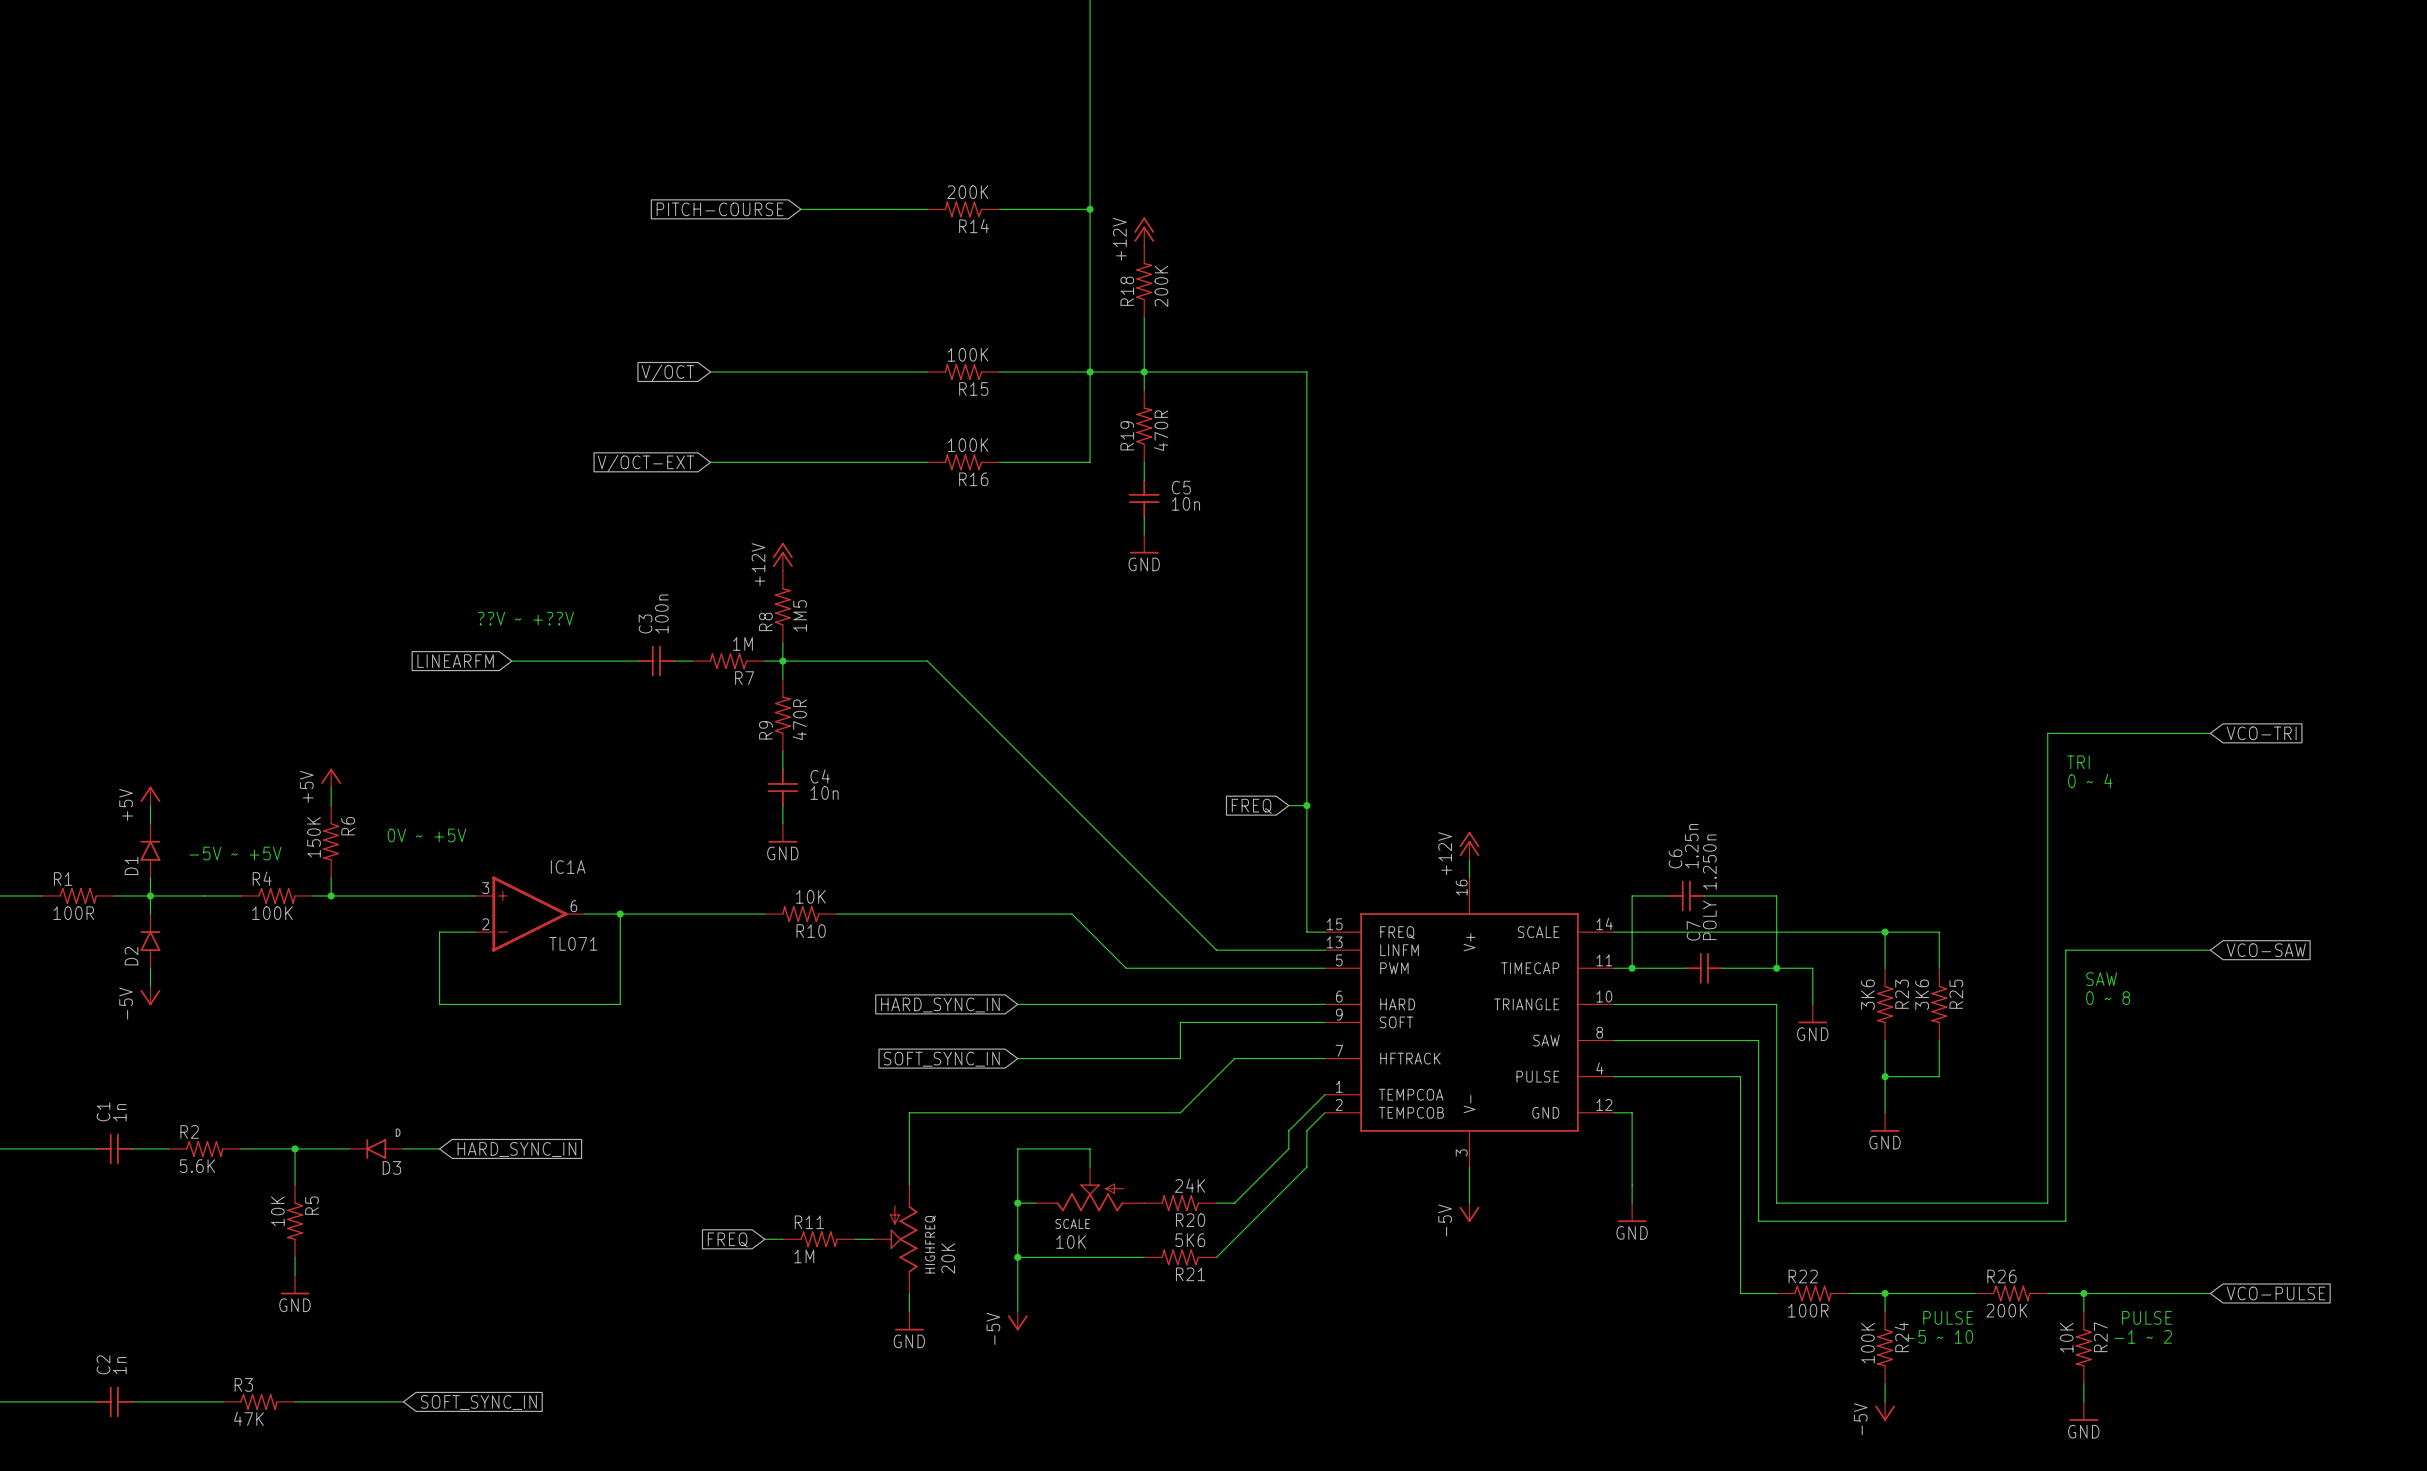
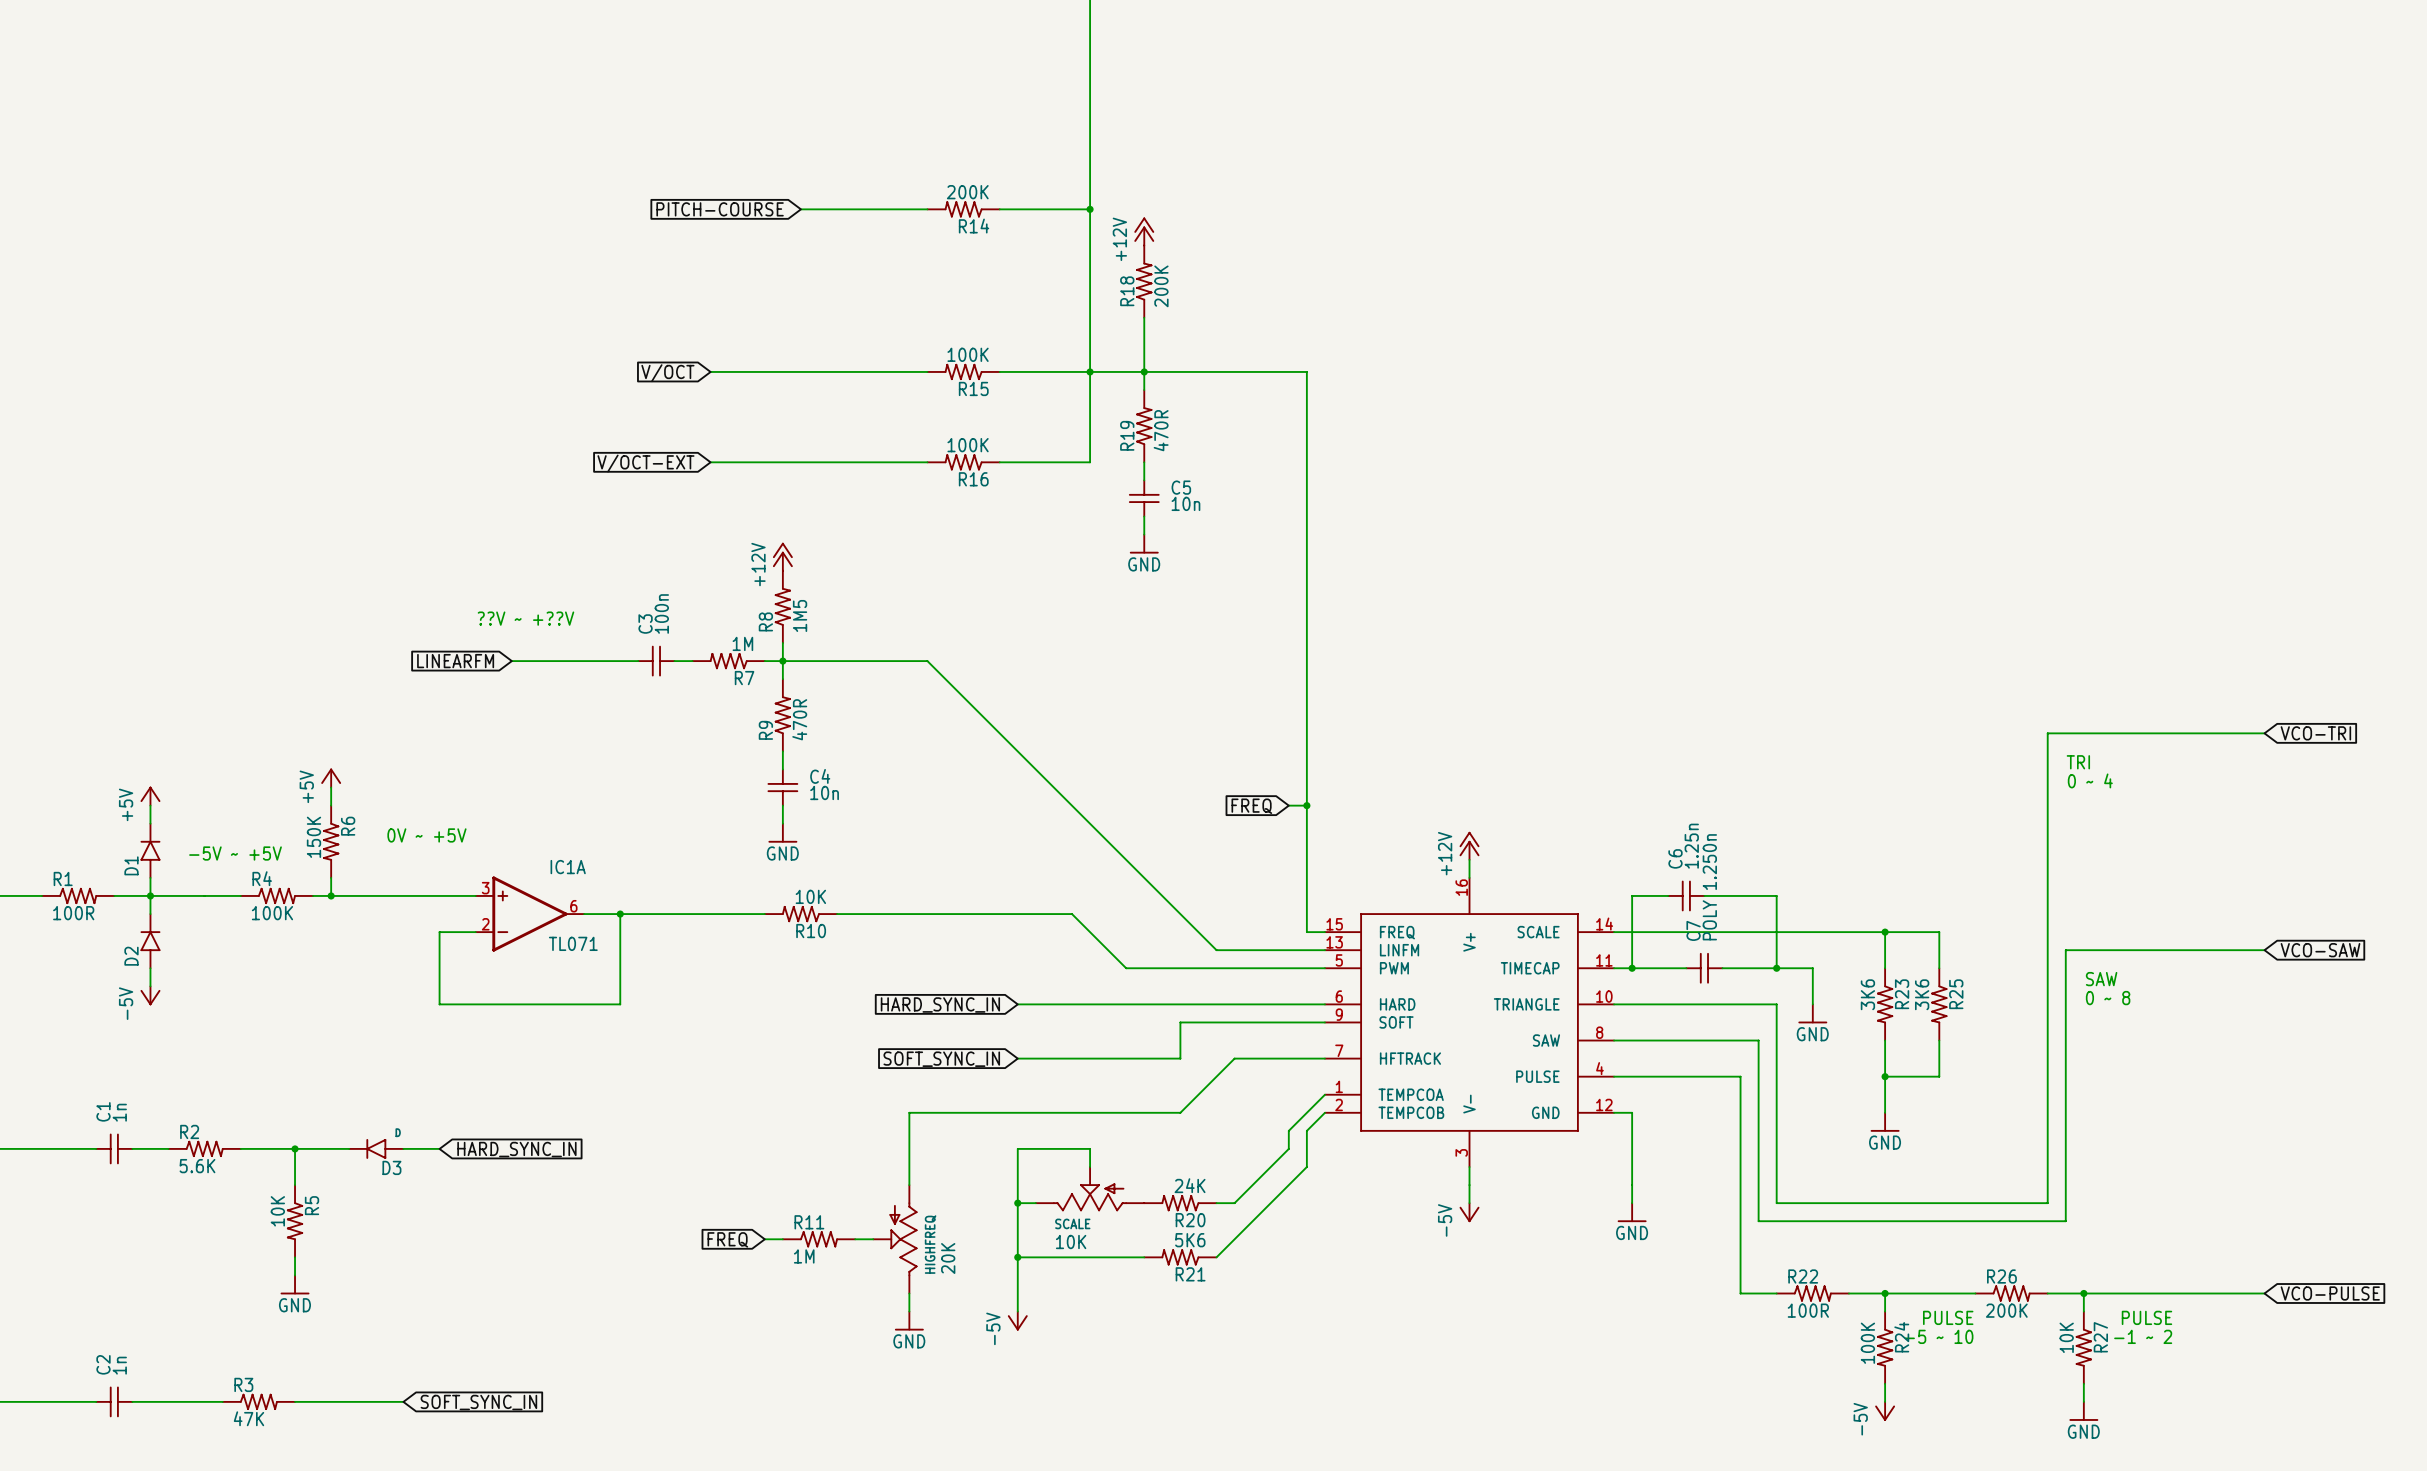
wire: none -> (2210, 733) (2264, 733)
global label position: VCO-TRI (2261, 733) -> VCO-TRI (2315, 733)
wire: none -> (2210, 950) (2264, 950)
global label position: VCO-SAW (2266, 950) -> VCO-SAW (2320, 950)
wire: none -> (2210, 1293) (2264, 1293)
global label position: VCO-PULSE (2276, 1293) -> VCO-PULSE (2330, 1293)

